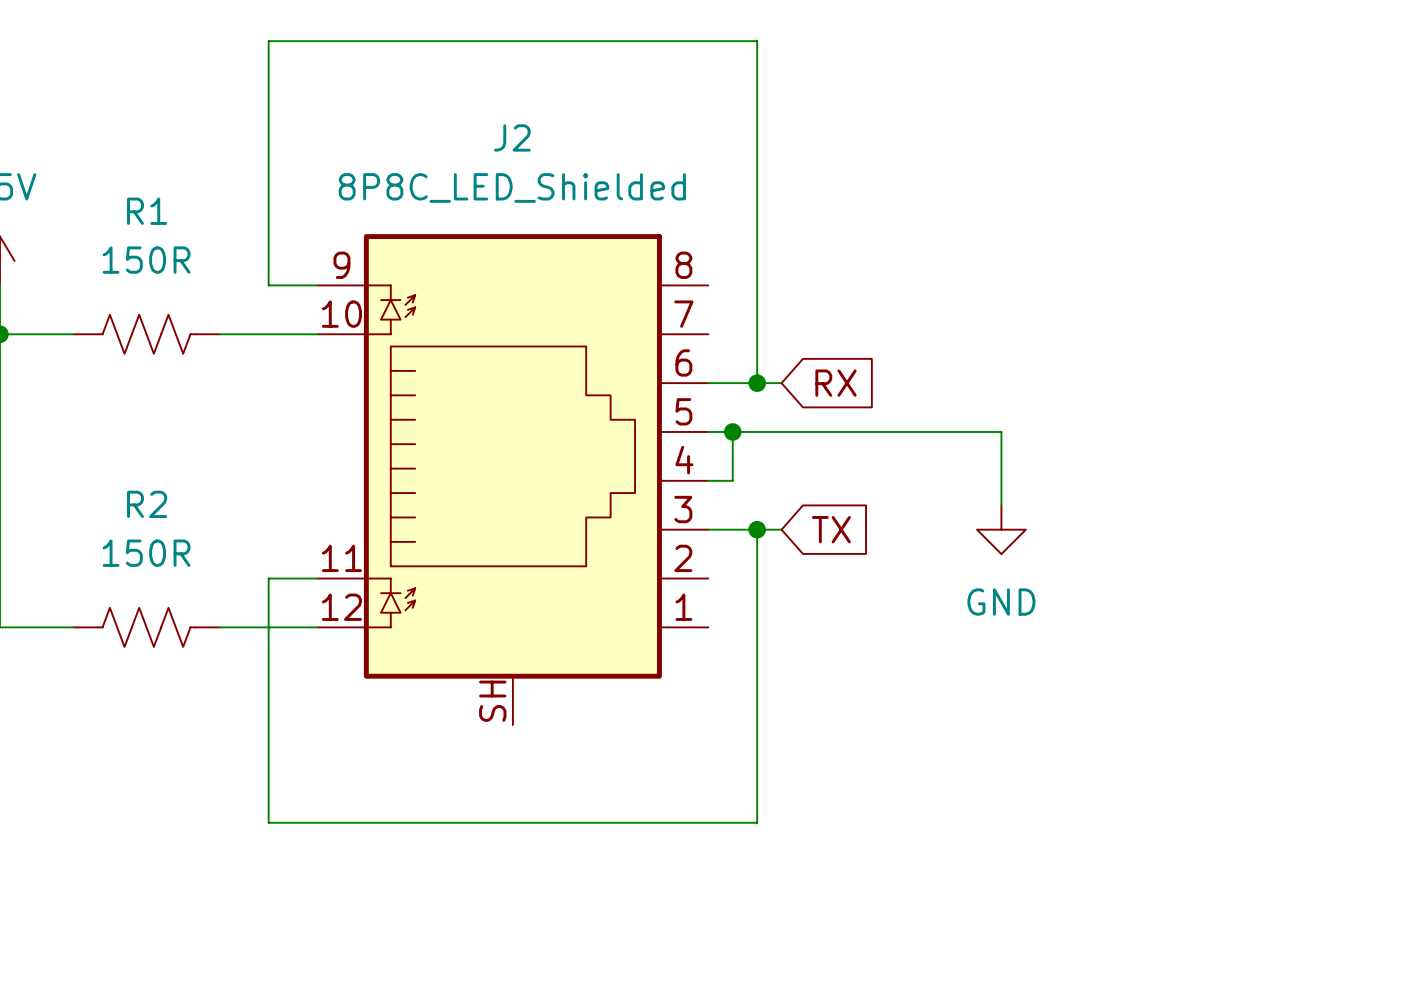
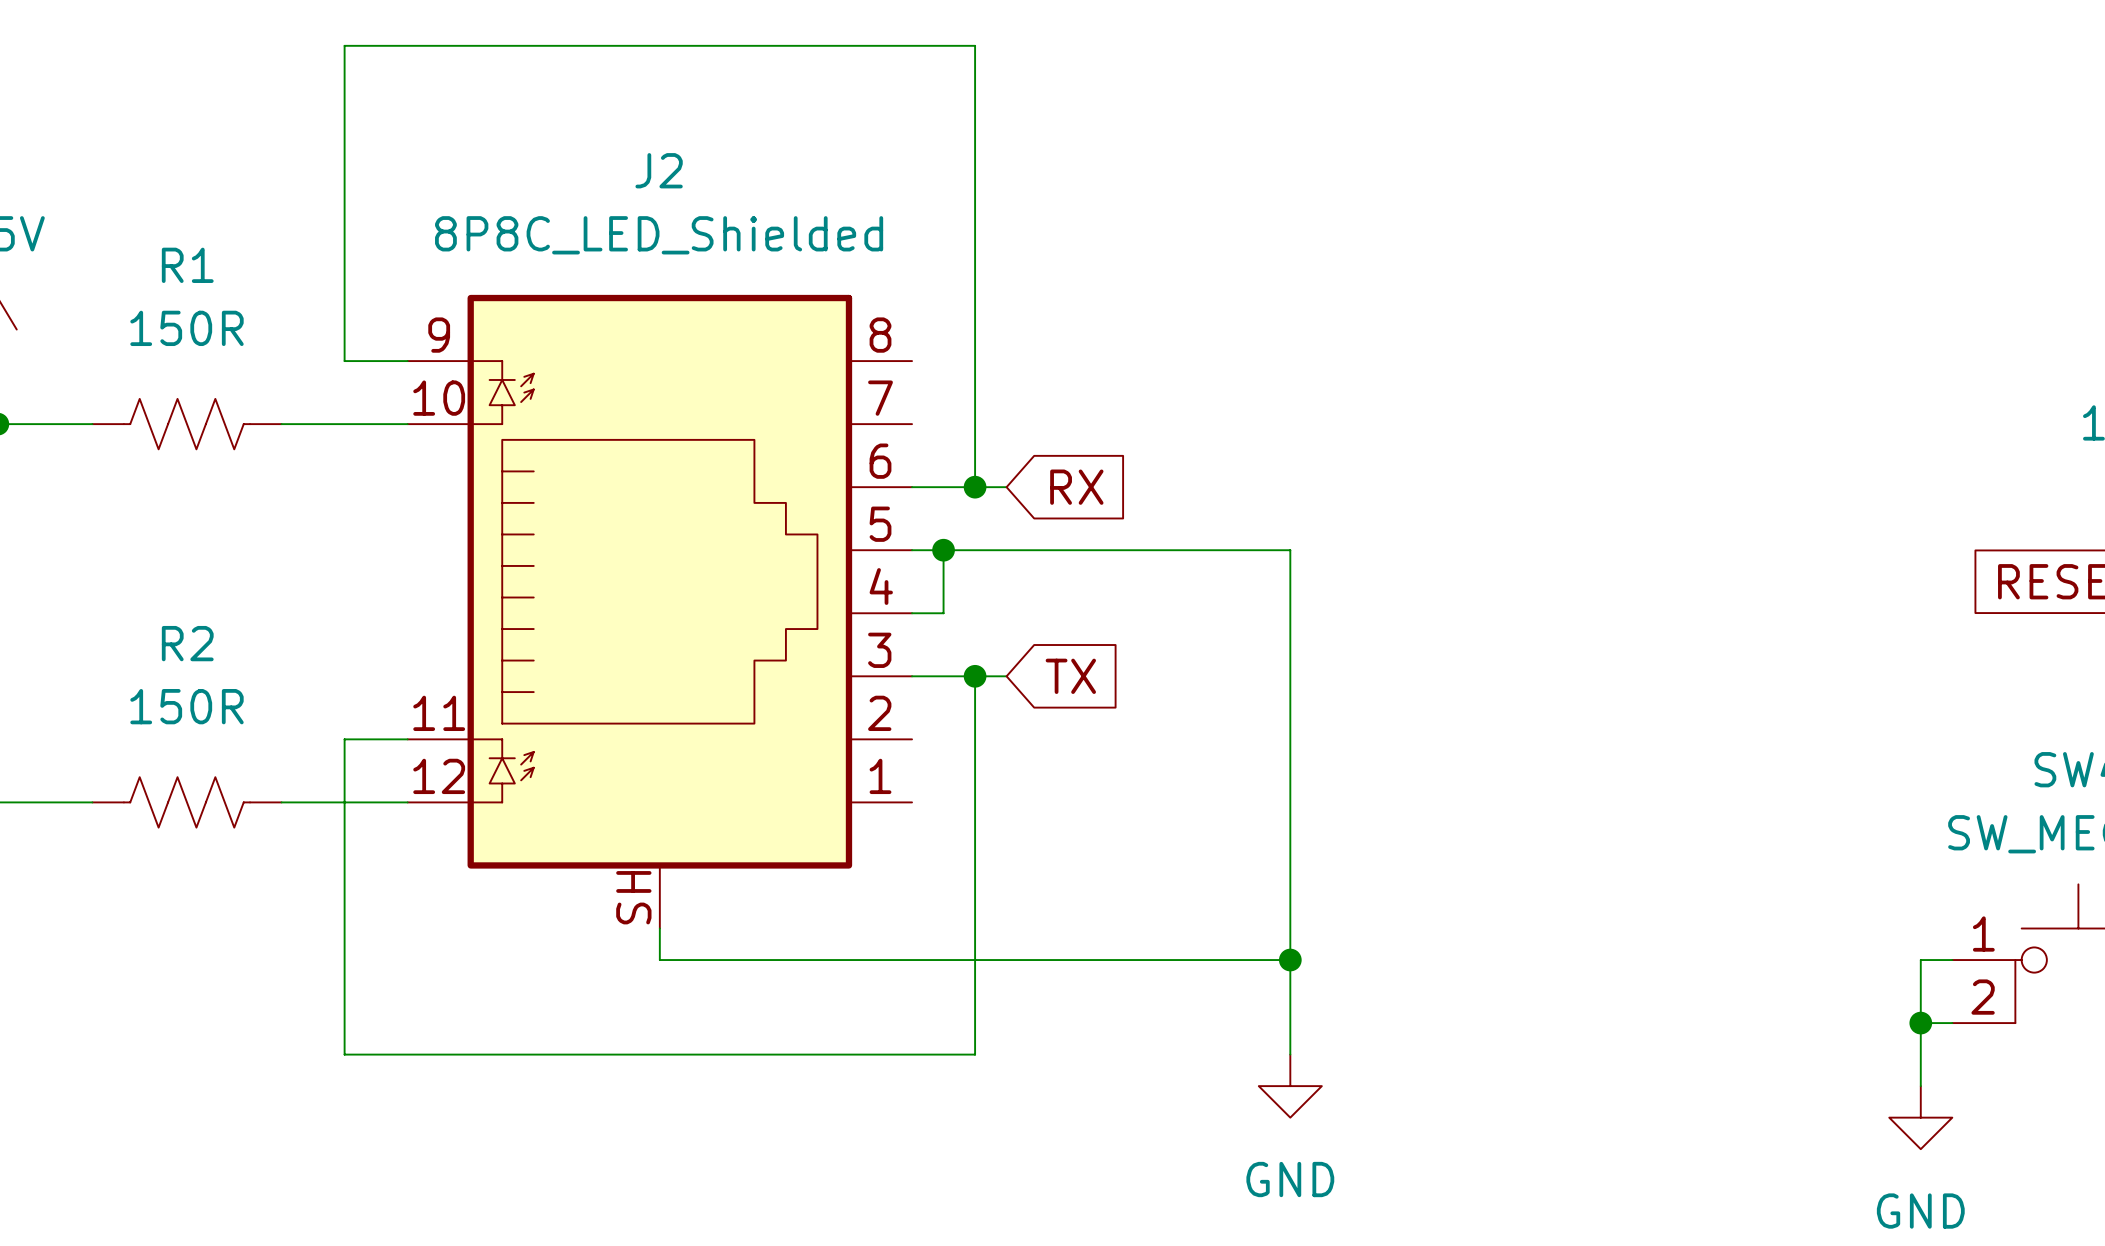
wire: none -> (1290, 644) (1290, 1054)
power symbol position: GND (1001, 529) -> GND (1290, 1086)
wire: none -> (659, 928) (659, 960) (1290, 960)
junction: none -> (1290, 960)

